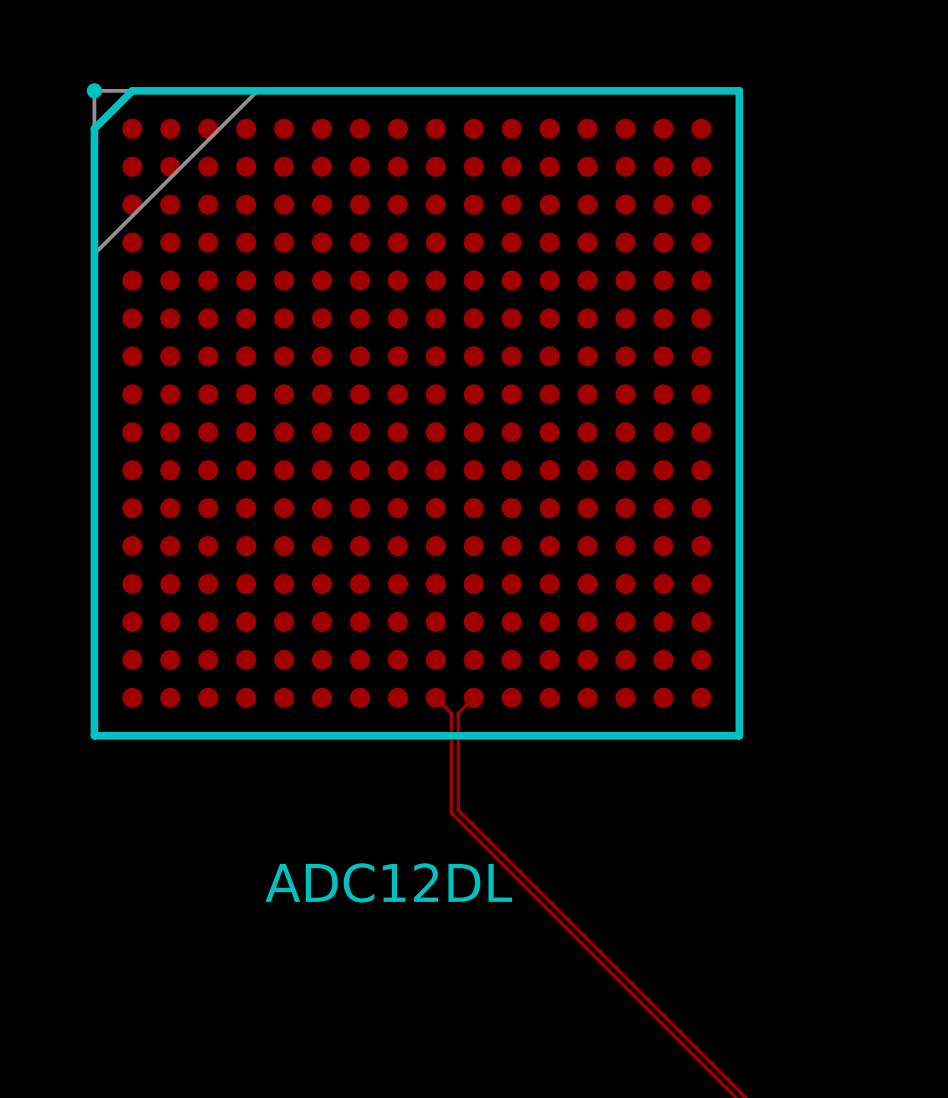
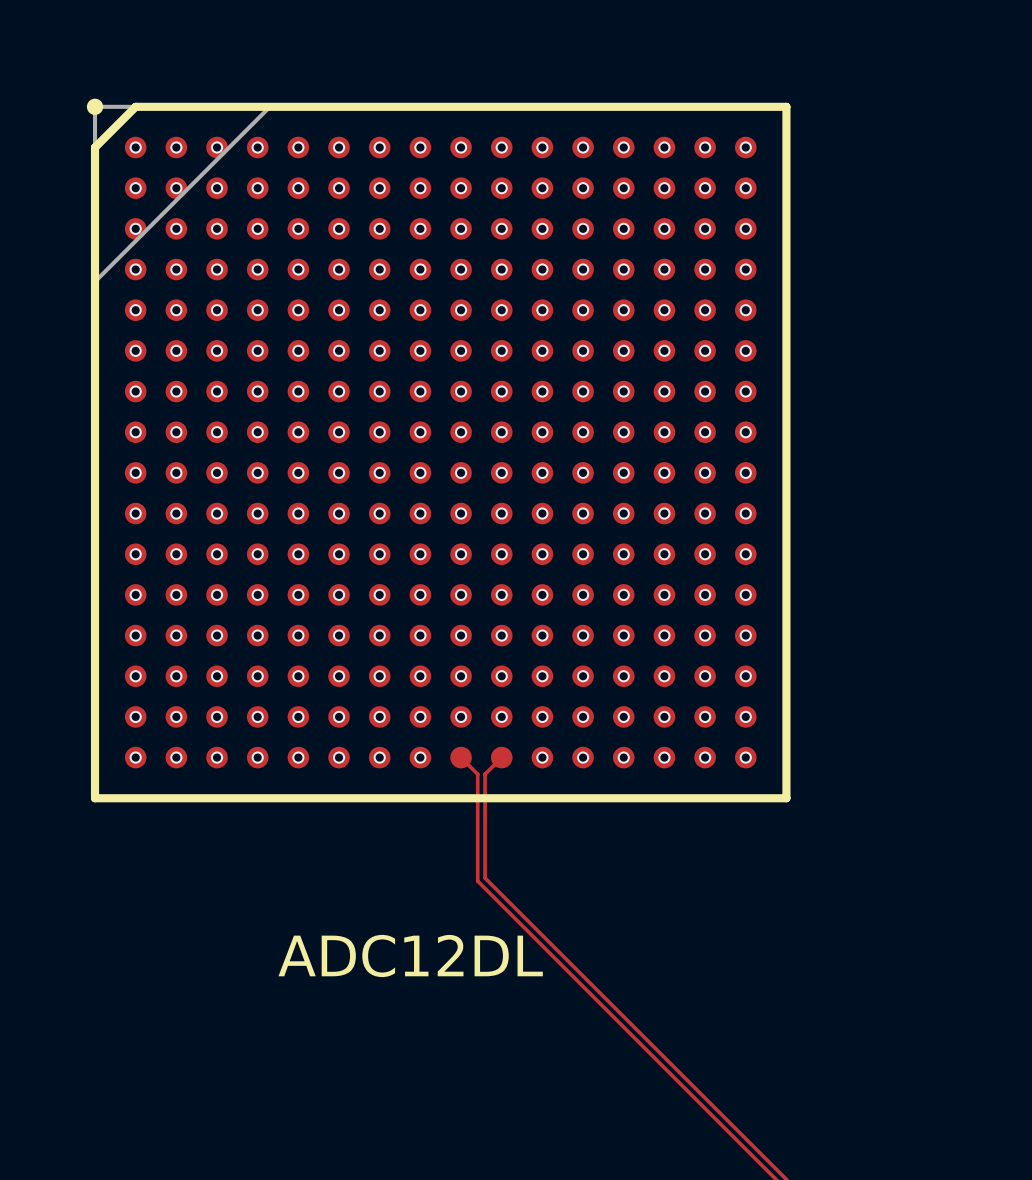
via: none -> (135, 147)
via: none -> (176, 147)
via: none -> (217, 147)
via: none -> (257, 147)
via: none -> (298, 147)
via: none -> (339, 147)
via: none -> (379, 147)
via: none -> (420, 147)
via: none -> (461, 147)
via: none -> (501, 147)
via: none -> (542, 147)
via: none -> (583, 147)
via: none -> (623, 147)
via: none -> (664, 147)
via: none -> (705, 147)
via: none -> (745, 147)
via: none -> (135, 188)
via: none -> (176, 188)
via: none -> (217, 188)
via: none -> (257, 188)
via: none -> (298, 188)
via: none -> (339, 188)
via: none -> (379, 188)
via: none -> (420, 188)
via: none -> (461, 188)
via: none -> (501, 188)
via: none -> (542, 188)
via: none -> (583, 188)
via: none -> (623, 188)
via: none -> (664, 188)
via: none -> (705, 188)
via: none -> (745, 188)
via: none -> (135, 228)
via: none -> (176, 228)
via: none -> (217, 228)
via: none -> (257, 228)
via: none -> (298, 228)
via: none -> (339, 228)
via: none -> (379, 228)
via: none -> (420, 228)
via: none -> (461, 228)
via: none -> (501, 228)
via: none -> (542, 228)
via: none -> (583, 228)
via: none -> (623, 228)
via: none -> (664, 228)
via: none -> (705, 228)
via: none -> (745, 228)
via: none -> (135, 269)
via: none -> (176, 269)
via: none -> (217, 269)
via: none -> (257, 269)
via: none -> (298, 269)
via: none -> (339, 269)
via: none -> (379, 269)
via: none -> (420, 269)
via: none -> (461, 269)
via: none -> (501, 269)
via: none -> (542, 269)
via: none -> (583, 269)
via: none -> (623, 269)
via: none -> (664, 269)
via: none -> (705, 269)
via: none -> (745, 269)
via: none -> (135, 310)
via: none -> (176, 310)
via: none -> (217, 310)
via: none -> (257, 310)
via: none -> (298, 310)
via: none -> (339, 310)
via: none -> (379, 310)
via: none -> (420, 310)
via: none -> (461, 310)
via: none -> (501, 310)
via: none -> (542, 310)
via: none -> (583, 310)
via: none -> (623, 310)
via: none -> (664, 310)
via: none -> (705, 310)
via: none -> (745, 310)
via: none -> (135, 350)
via: none -> (176, 350)
via: none -> (217, 350)
via: none -> (257, 350)
via: none -> (298, 350)
via: none -> (339, 350)
via: none -> (379, 350)
via: none -> (420, 350)
via: none -> (461, 350)
via: none -> (501, 350)
via: none -> (542, 350)
via: none -> (583, 350)
via: none -> (623, 350)
via: none -> (664, 350)
via: none -> (705, 350)
via: none -> (745, 350)
via: none -> (135, 391)
via: none -> (176, 391)
via: none -> (217, 391)
via: none -> (257, 391)
via: none -> (298, 391)
via: none -> (339, 391)
via: none -> (379, 391)
via: none -> (420, 391)
via: none -> (461, 391)
via: none -> (501, 391)
via: none -> (542, 391)
via: none -> (583, 391)
via: none -> (623, 391)
via: none -> (664, 391)
via: none -> (705, 391)
via: none -> (745, 391)
via: none -> (135, 432)
via: none -> (176, 432)
via: none -> (217, 432)
via: none -> (257, 432)
via: none -> (298, 432)
via: none -> (339, 432)
via: none -> (379, 432)
via: none -> (420, 432)
via: none -> (461, 432)
via: none -> (501, 432)
via: none -> (542, 432)
via: none -> (583, 432)
via: none -> (623, 432)
via: none -> (664, 432)
via: none -> (705, 432)
via: none -> (745, 432)
via: none -> (135, 472)
via: none -> (176, 472)
via: none -> (217, 472)
via: none -> (257, 472)
via: none -> (298, 472)
via: none -> (339, 472)
via: none -> (379, 472)
via: none -> (420, 472)
via: none -> (461, 472)
via: none -> (501, 472)
via: none -> (542, 472)
via: none -> (583, 472)
via: none -> (623, 472)
via: none -> (664, 472)
via: none -> (705, 472)
via: none -> (745, 472)
via: none -> (135, 513)
via: none -> (176, 513)
via: none -> (217, 513)
via: none -> (257, 513)
via: none -> (298, 513)
via: none -> (339, 513)
via: none -> (379, 513)
via: none -> (420, 513)
via: none -> (461, 513)
via: none -> (501, 513)
via: none -> (542, 513)
via: none -> (583, 513)
via: none -> (623, 513)
via: none -> (664, 513)
via: none -> (705, 513)
via: none -> (745, 513)
via: none -> (135, 554)
via: none -> (176, 554)
via: none -> (217, 554)
via: none -> (257, 554)
via: none -> (298, 554)
via: none -> (339, 554)
via: none -> (379, 554)
via: none -> (420, 554)
via: none -> (461, 554)
via: none -> (501, 554)
via: none -> (542, 554)
via: none -> (583, 554)
via: none -> (623, 554)
via: none -> (664, 554)
via: none -> (705, 554)
via: none -> (745, 554)
via: none -> (135, 594)
via: none -> (176, 594)
via: none -> (217, 594)
via: none -> (257, 594)
via: none -> (298, 594)
via: none -> (339, 594)
via: none -> (379, 594)
via: none -> (420, 594)
via: none -> (461, 594)
via: none -> (501, 594)
via: none -> (542, 594)
via: none -> (583, 594)
via: none -> (623, 594)
via: none -> (664, 594)
via: none -> (705, 594)
via: none -> (745, 594)
via: none -> (135, 635)
via: none -> (176, 635)
via: none -> (217, 635)
via: none -> (257, 635)
via: none -> (298, 635)
via: none -> (339, 635)
via: none -> (379, 635)
via: none -> (420, 635)
via: none -> (461, 635)
via: none -> (501, 635)
via: none -> (542, 635)
via: none -> (583, 635)
via: none -> (623, 635)
via: none -> (664, 635)
via: none -> (705, 635)
via: none -> (745, 635)
via: none -> (135, 676)
via: none -> (176, 676)
via: none -> (217, 676)
via: none -> (257, 676)
via: none -> (298, 676)
via: none -> (339, 676)
via: none -> (379, 676)
via: none -> (420, 676)
via: none -> (461, 676)
via: none -> (501, 676)
via: none -> (542, 676)
via: none -> (583, 676)
via: none -> (623, 676)
via: none -> (664, 676)
via: none -> (705, 676)
via: none -> (745, 676)
via: none -> (135, 716)
via: none -> (176, 716)
via: none -> (217, 716)
via: none -> (257, 716)
via: none -> (298, 716)
via: none -> (339, 716)
via: none -> (379, 716)
via: none -> (420, 716)
via: none -> (461, 716)
via: none -> (501, 716)
via: none -> (542, 716)
via: none -> (583, 716)
via: none -> (623, 716)
via: none -> (664, 716)
via: none -> (705, 716)
via: none -> (745, 716)
via: none -> (135, 757)
via: none -> (176, 757)
via: none -> (217, 757)
via: none -> (257, 757)
via: none -> (298, 757)
via: none -> (339, 757)
via: none -> (379, 757)
via: none -> (420, 757)
via: none -> (542, 757)
via: none -> (583, 757)
via: none -> (623, 757)
via: none -> (664, 757)
via: none -> (705, 757)
via: none -> (745, 757)

